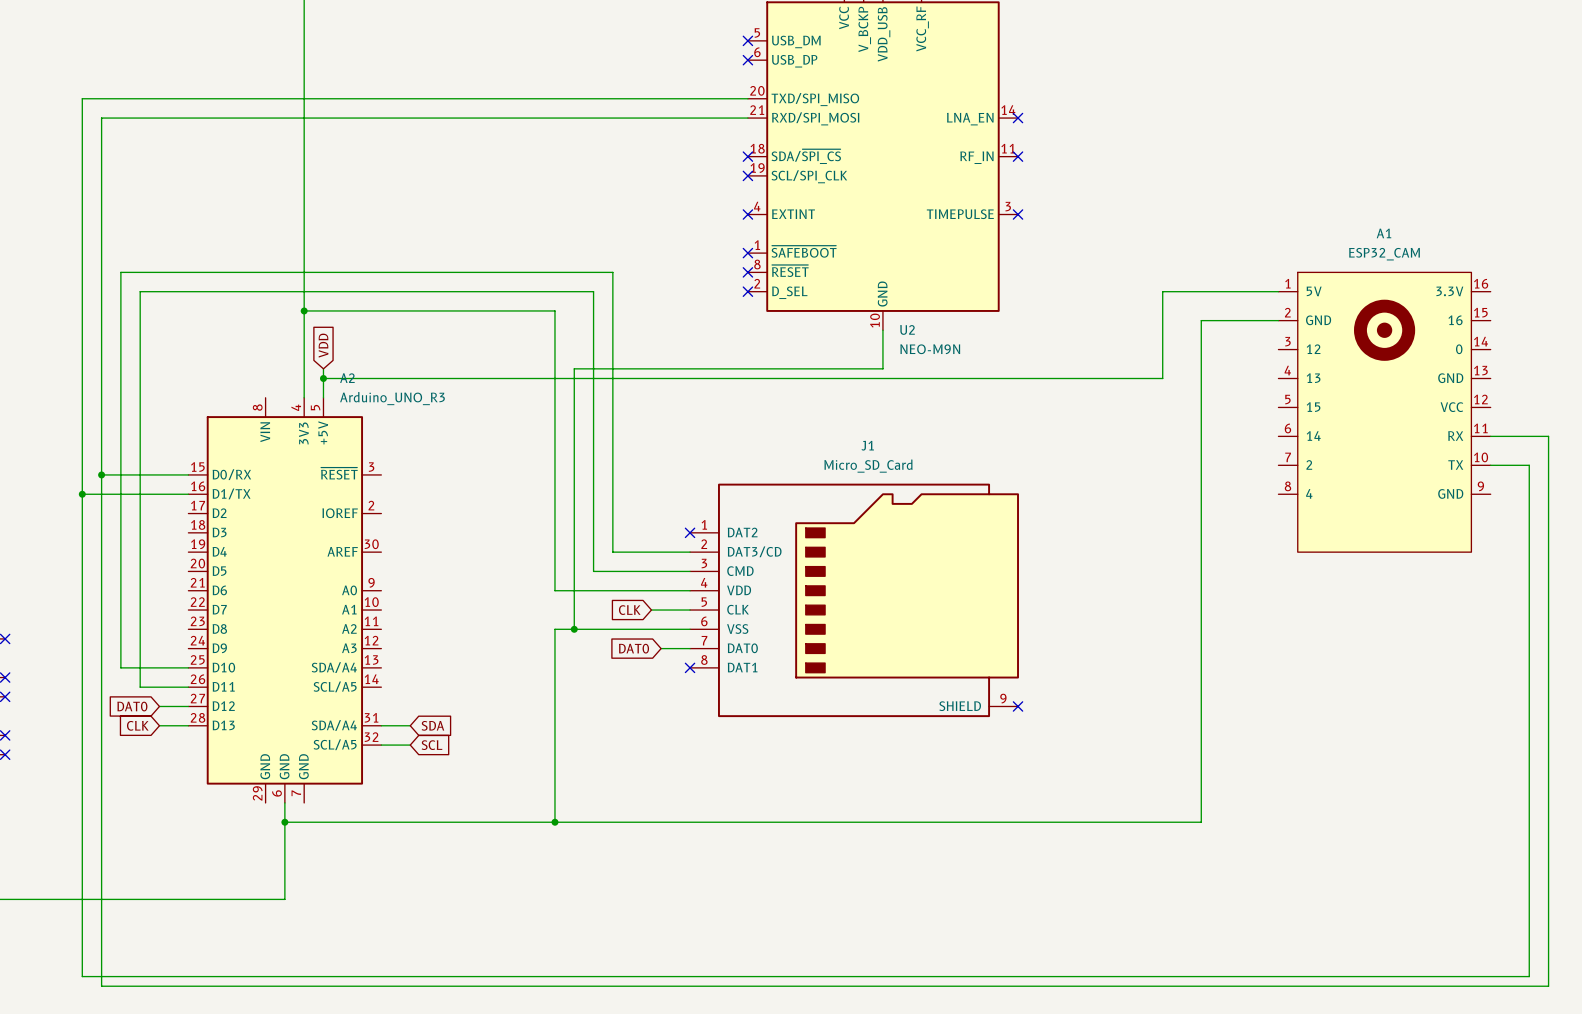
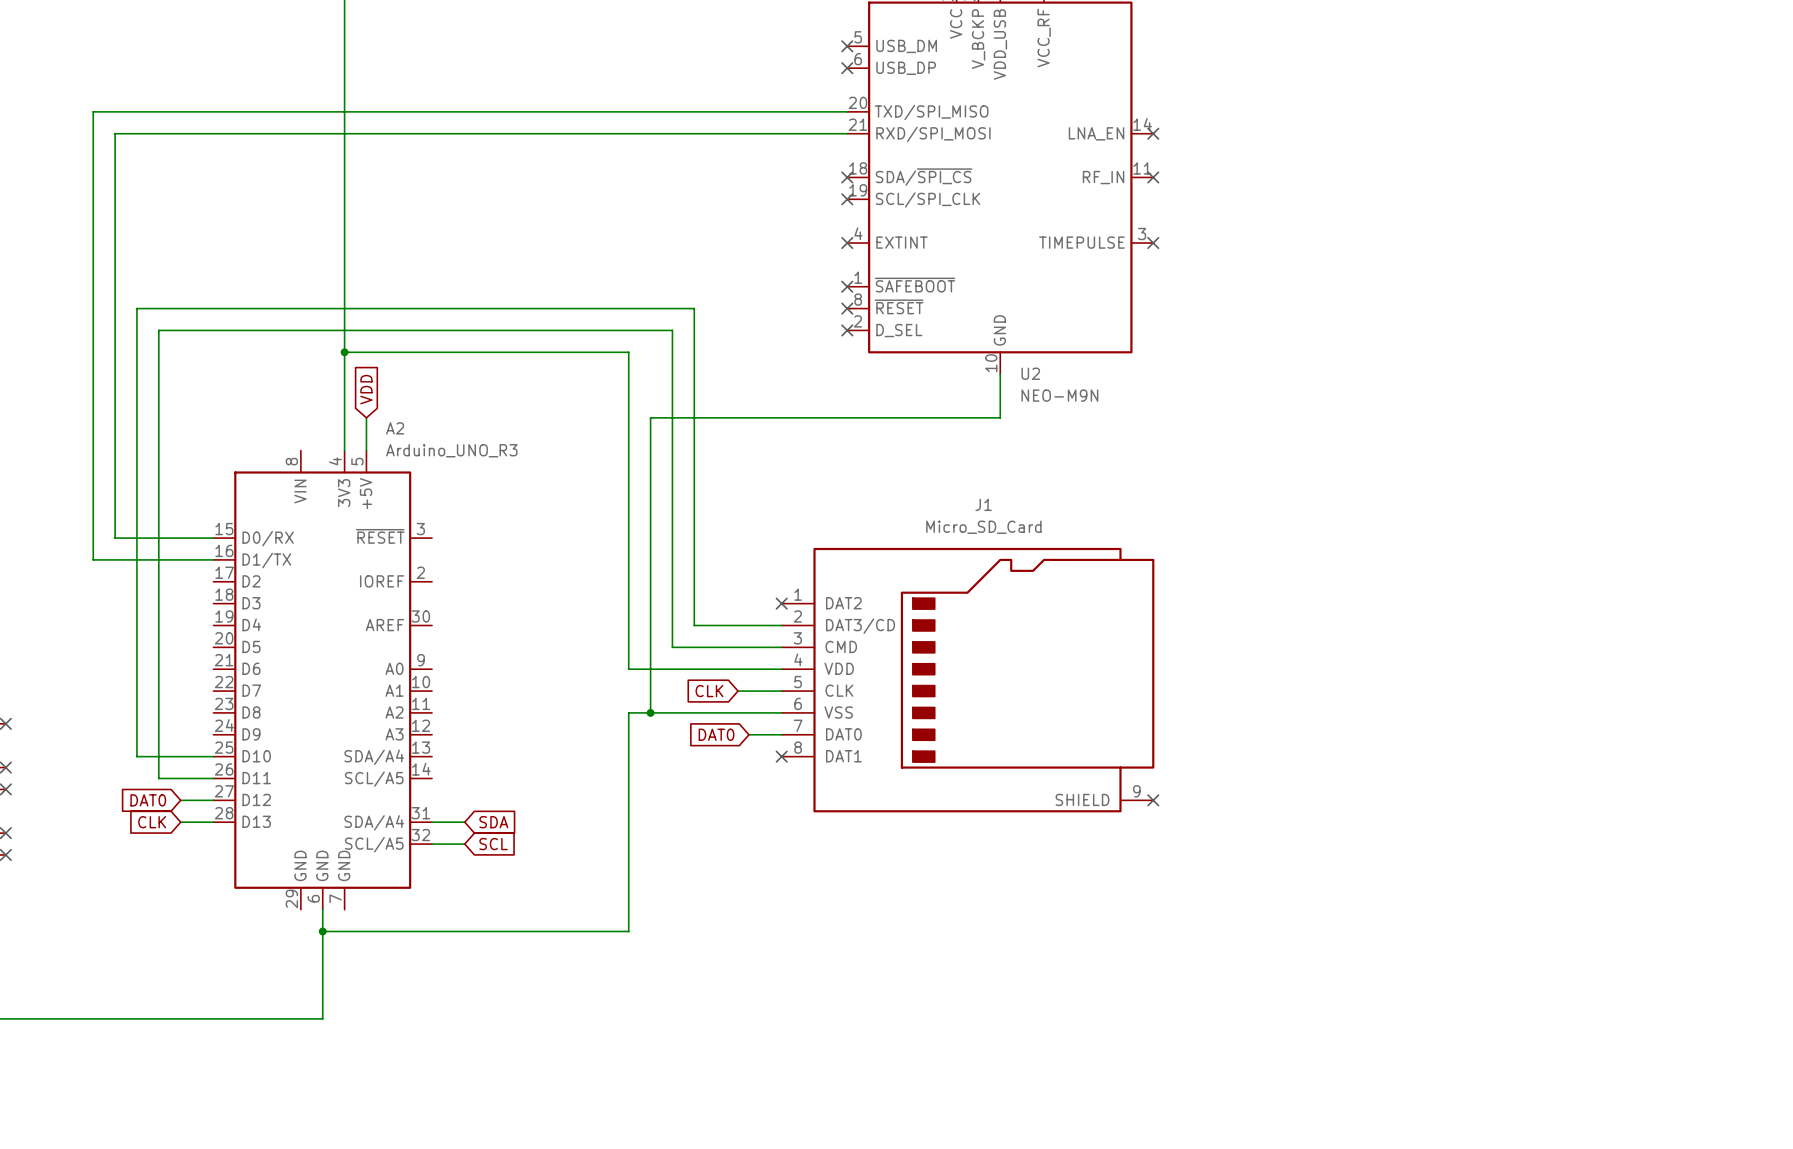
wire: (1278, 291) (1162, 291) (1162, 378) (323, 378) -> none
wire: (1278, 320) (1201, 320) (1201, 822) (554, 822) -> none
junction: (323, 378) -> none
A1: ESP32_CAM (1384, 412) -> none
wire: (1490, 436) (1548, 436) (1548, 986) (101, 986) (101, 474) -> none
wire: (1490, 465) (1529, 465) (1529, 976) (82, 976) (82, 494) -> none
junction: (101, 474) -> none
junction: (82, 494) -> none
junction: (554, 822) -> none

